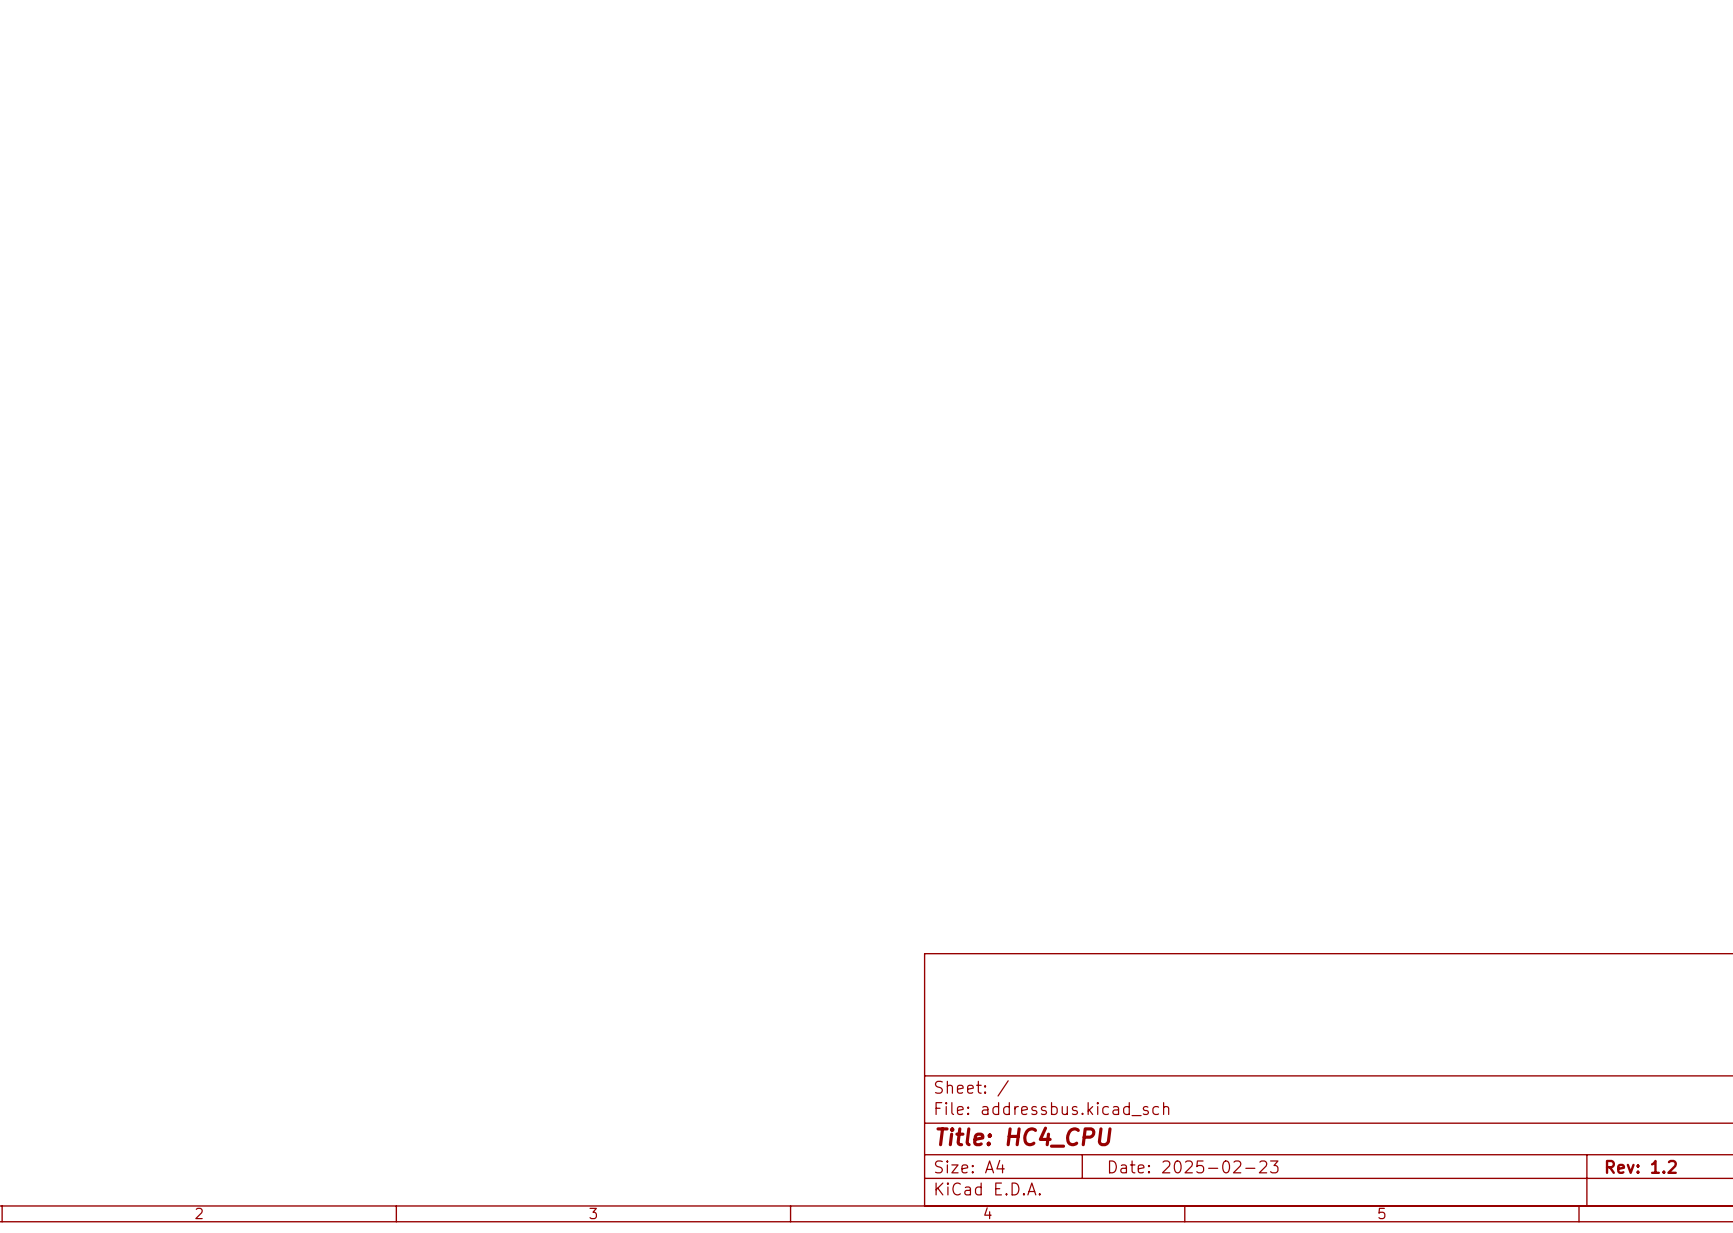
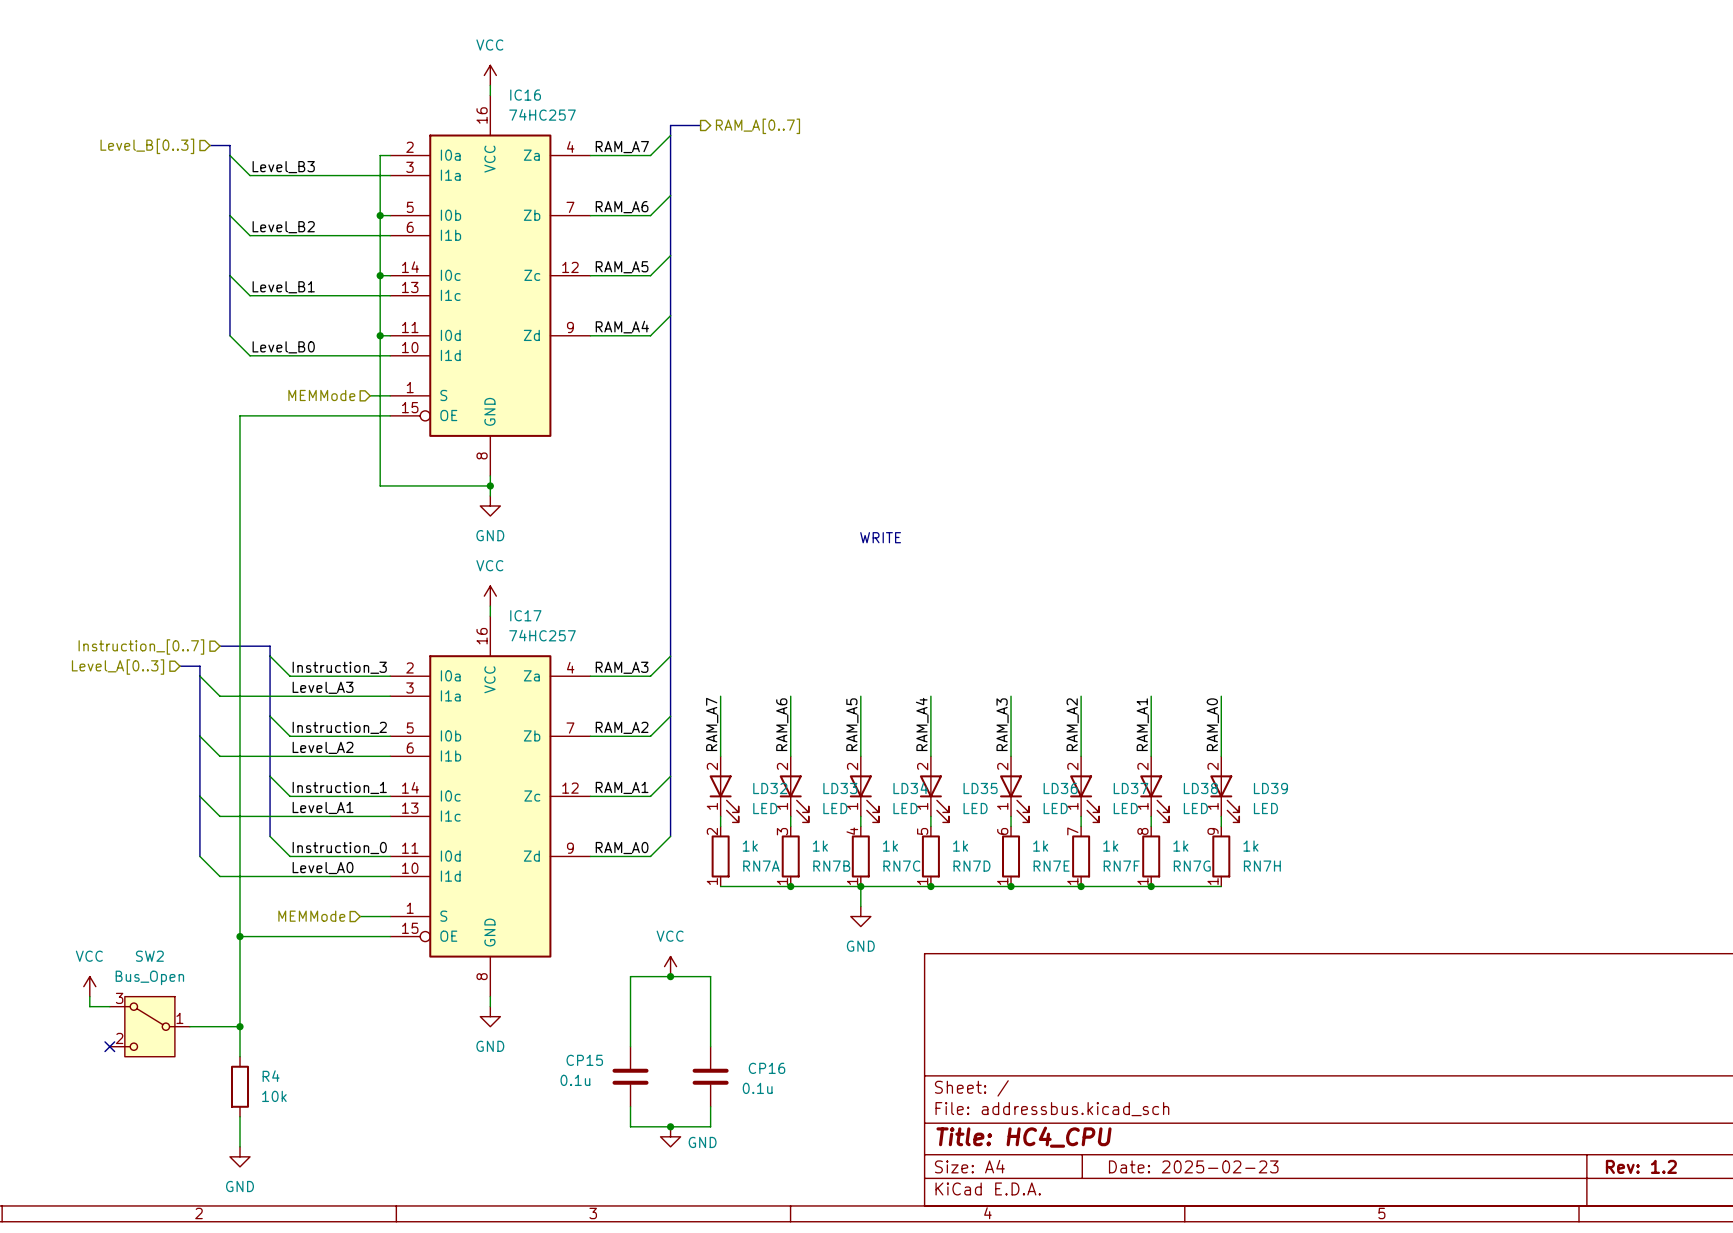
power symbol: none -> VCC (490, 75)
wire: none -> (490, 85) (490, 95)
bus: none -> (700, 125) (670, 125) (670, 836)
hierarchical label: none -> RAM_A[0..7] (757, 126)
wire: none -> (670, 135) (650, 155) (590, 155)
bus: none -> (209, 145) (229, 145) (229, 335)
hierarchical label: none -> Level_B[0..3] (147, 146)
label: none -> RAM_A7 (622, 147)
wire: none -> (229, 155) (250, 175) (390, 175)
wire: none -> (390, 155) (380, 155) (380, 485) (490, 485)
label: none -> Level_B3 (283, 167)
wire: none -> (670, 195) (650, 215) (590, 215)
label: none -> RAM_A6 (622, 207)
wire: none -> (229, 215) (250, 235) (390, 235)
wire: none -> (380, 215) (390, 215)
junction: none -> (380, 215)
label: none -> Level_B2 (283, 227)
wire: none -> (670, 255) (650, 275) (590, 275)
label: none -> RAM_A5 (622, 267)
wire: none -> (229, 275) (250, 295) (390, 295)
wire: none -> (380, 275) (390, 275)
junction: none -> (380, 275)
IC16: none -> 74HC257 (490, 285)
label: none -> Level_B1 (283, 287)
wire: none -> (670, 315) (650, 335) (590, 335)
label: none -> RAM_A4 (622, 327)
wire: none -> (229, 335) (250, 355) (390, 355)
wire: none -> (380, 335) (390, 335)
junction: none -> (380, 335)
label: none -> Level_B0 (283, 347)
hierarchical label: none -> MEMMode (321, 395)
wire: none -> (370, 395) (390, 395)
wire: none -> (390, 415) (240, 415) (240, 1056)
wire: none -> (490, 475) (490, 495)
junction: none -> (490, 485)
power symbol: none -> GND (490, 506)
text: none -> WRITE (880, 537)
power symbol: none -> VCC (490, 596)
wire: none -> (490, 606) (490, 616)
bus: none -> (219, 646) (270, 646) (270, 836)
hierarchical label: none -> Instruction_[0..7] (141, 647)
wire: none -> (270, 656) (290, 676) (390, 676)
wire: none -> (670, 656) (650, 676) (590, 676)
bus: none -> (179, 666) (199, 666) (199, 856)
hierarchical label: none -> Level_A[0..3] (118, 667)
label: none -> Instruction_3 (339, 667)
label: none -> RAM_A3 (622, 667)
wire: none -> (199, 676) (219, 696) (390, 696)
label: none -> Level_A3 (323, 687)
wire: none -> (720, 696) (720, 756)
wire: none -> (790, 696) (790, 756)
wire: none -> (860, 696) (860, 756)
wire: none -> (930, 696) (930, 756)
wire: none -> (1011, 696) (1011, 756)
wire: none -> (1081, 696) (1081, 756)
wire: none -> (1151, 696) (1151, 756)
wire: none -> (1221, 696) (1221, 756)
wire: none -> (270, 716) (290, 736) (390, 736)
wire: none -> (670, 716) (650, 736) (590, 736)
label: none -> RAM_A7 (712, 724)
label: none -> RAM_A6 (782, 724)
label: none -> RAM_A5 (852, 724)
label: none -> RAM_A4 (922, 724)
label: none -> RAM_A3 (1002, 724)
label: none -> RAM_A2 (1072, 724)
label: none -> RAM_A1 (1142, 724)
label: none -> RAM_A0 (1212, 724)
label: none -> Instruction_2 (339, 727)
label: none -> RAM_A2 (622, 727)
wire: none -> (199, 736) (219, 756) (390, 756)
label: none -> Level_A2 (323, 747)
wire: none -> (270, 776) (290, 796) (390, 796)
wire: none -> (670, 776) (650, 796) (590, 796)
label: none -> Instruction_1 (339, 787)
label: none -> RAM_A1 (622, 787)
LD32: none -> LED (724, 789)
LD33: none -> LED (794, 789)
LD34: none -> LED (864, 789)
LD35: none -> LED (934, 789)
LD36: none -> LED (1014, 789)
LD37: none -> LED (1084, 789)
LD38: none -> LED (1154, 789)
LD39: none -> LED (1224, 789)
wire: none -> (199, 796) (219, 816) (390, 816)
IC17: none -> 74HC257 (490, 806)
label: none -> Level_A1 (323, 807)
wire: none -> (720, 816) (720, 826)
wire: none -> (790, 816) (790, 826)
wire: none -> (860, 816) (860, 826)
wire: none -> (930, 816) (930, 826)
wire: none -> (1011, 816) (1011, 826)
wire: none -> (1081, 816) (1081, 826)
wire: none -> (1151, 816) (1151, 826)
wire: none -> (1221, 816) (1221, 826)
wire: none -> (270, 836) (290, 856) (390, 856)
wire: none -> (670, 836) (650, 856) (590, 856)
label: none -> Instruction_0 (339, 848)
label: none -> RAM_A0 (622, 848)
wire: none -> (199, 856) (219, 876) (390, 876)
RN7A: none -> 1k (720, 856)
RN7B: none -> 1k (790, 856)
RN7C: none -> 1k (860, 856)
RN7D: none -> 1k (930, 856)
RN7E: none -> 1k (1011, 856)
RN7F: none -> 1k (1081, 856)
RN7G: none -> 1k (1151, 856)
RN7H: none -> 1k (1221, 856)
label: none -> Level_A0 (323, 868)
wire: none -> (720, 886) (1221, 886)
junction: none -> (790, 886)
wire: none -> (860, 886) (860, 906)
junction: none -> (860, 886)
junction: none -> (930, 886)
junction: none -> (1011, 886)
junction: none -> (1081, 886)
junction: none -> (1151, 886)
hierarchical label: none -> MEMMode (311, 916)
wire: none -> (360, 916) (390, 916)
power symbol: none -> GND (860, 916)
wire: none -> (240, 936) (390, 936)
junction: none -> (240, 936)
power symbol: none -> VCC (670, 966)
junction: none -> (670, 976)
power symbol: none -> VCC (89, 986)
wire: none -> (89, 996) (89, 1006) (109, 1006)
wire: none -> (490, 996) (490, 1006)
power symbol: none -> GND (490, 1016)
SW2: none -> Bus_Open (149, 1026)
wire: none -> (189, 1026) (240, 1026)
junction: none -> (240, 1026)
no-connect mark: none -> (109, 1046)
wire: none -> (630, 1046) (630, 976) (710, 976) (710, 1046)
CP15: none -> 0.1u (630, 1076)
CP16: none -> 0.1u (710, 1076)
R4: none -> 10k (240, 1086)
wire: none -> (630, 1106) (630, 1126) (710, 1126) (710, 1106)
wire: none -> (240, 1116) (240, 1146)
junction: none -> (670, 1126)
power symbol: none -> GND (670, 1136)
power symbol: none -> GND (240, 1156)

